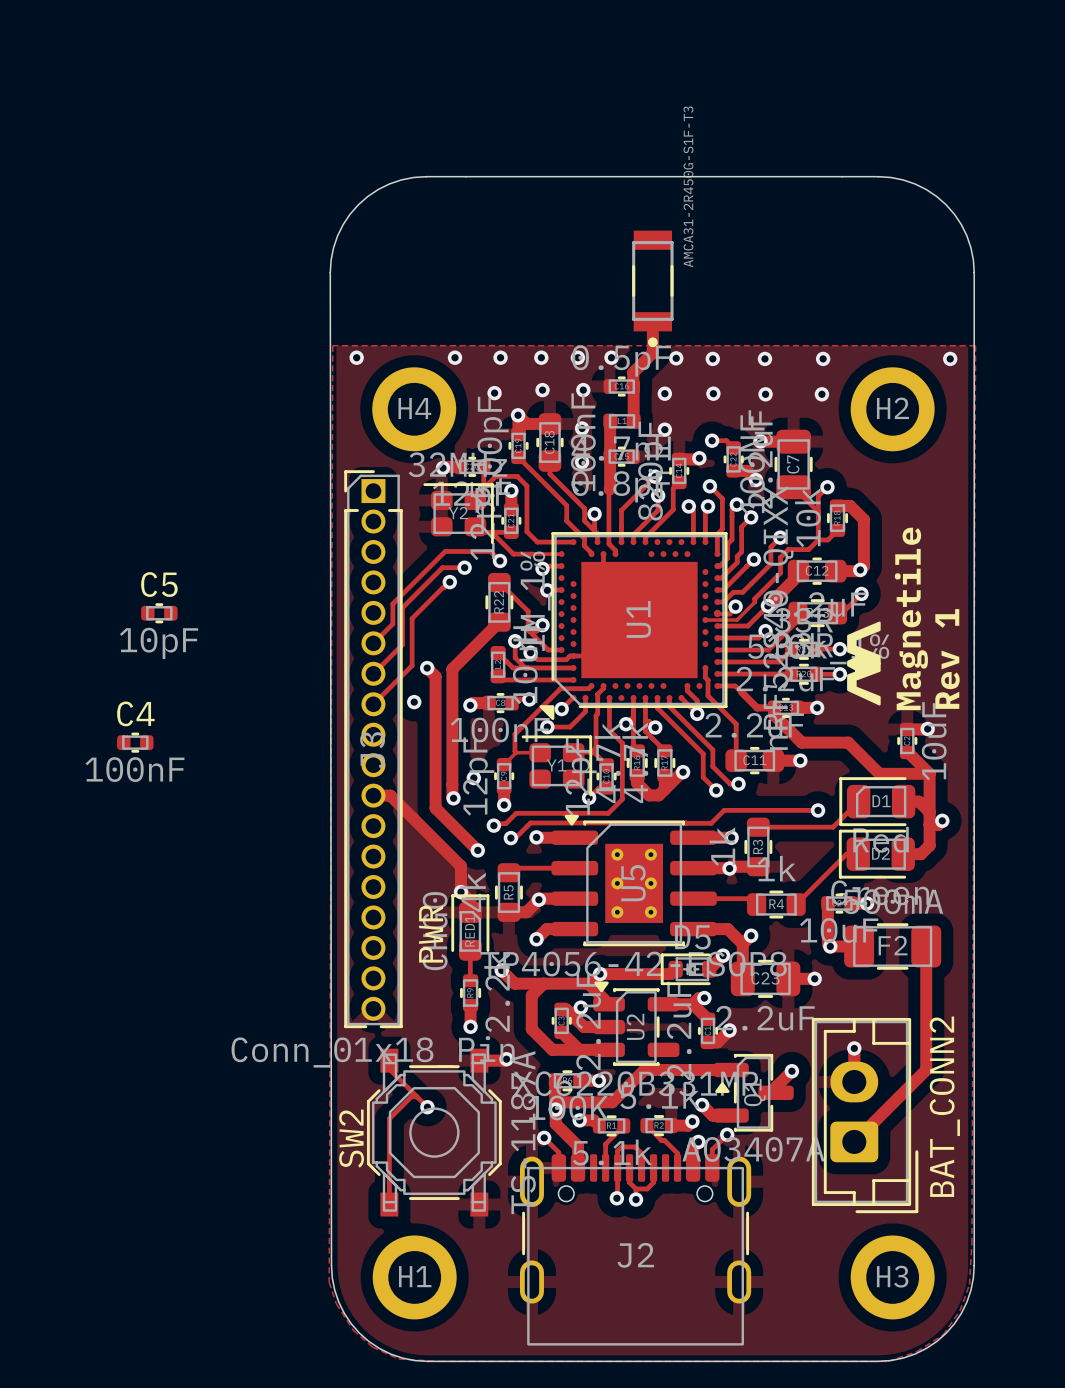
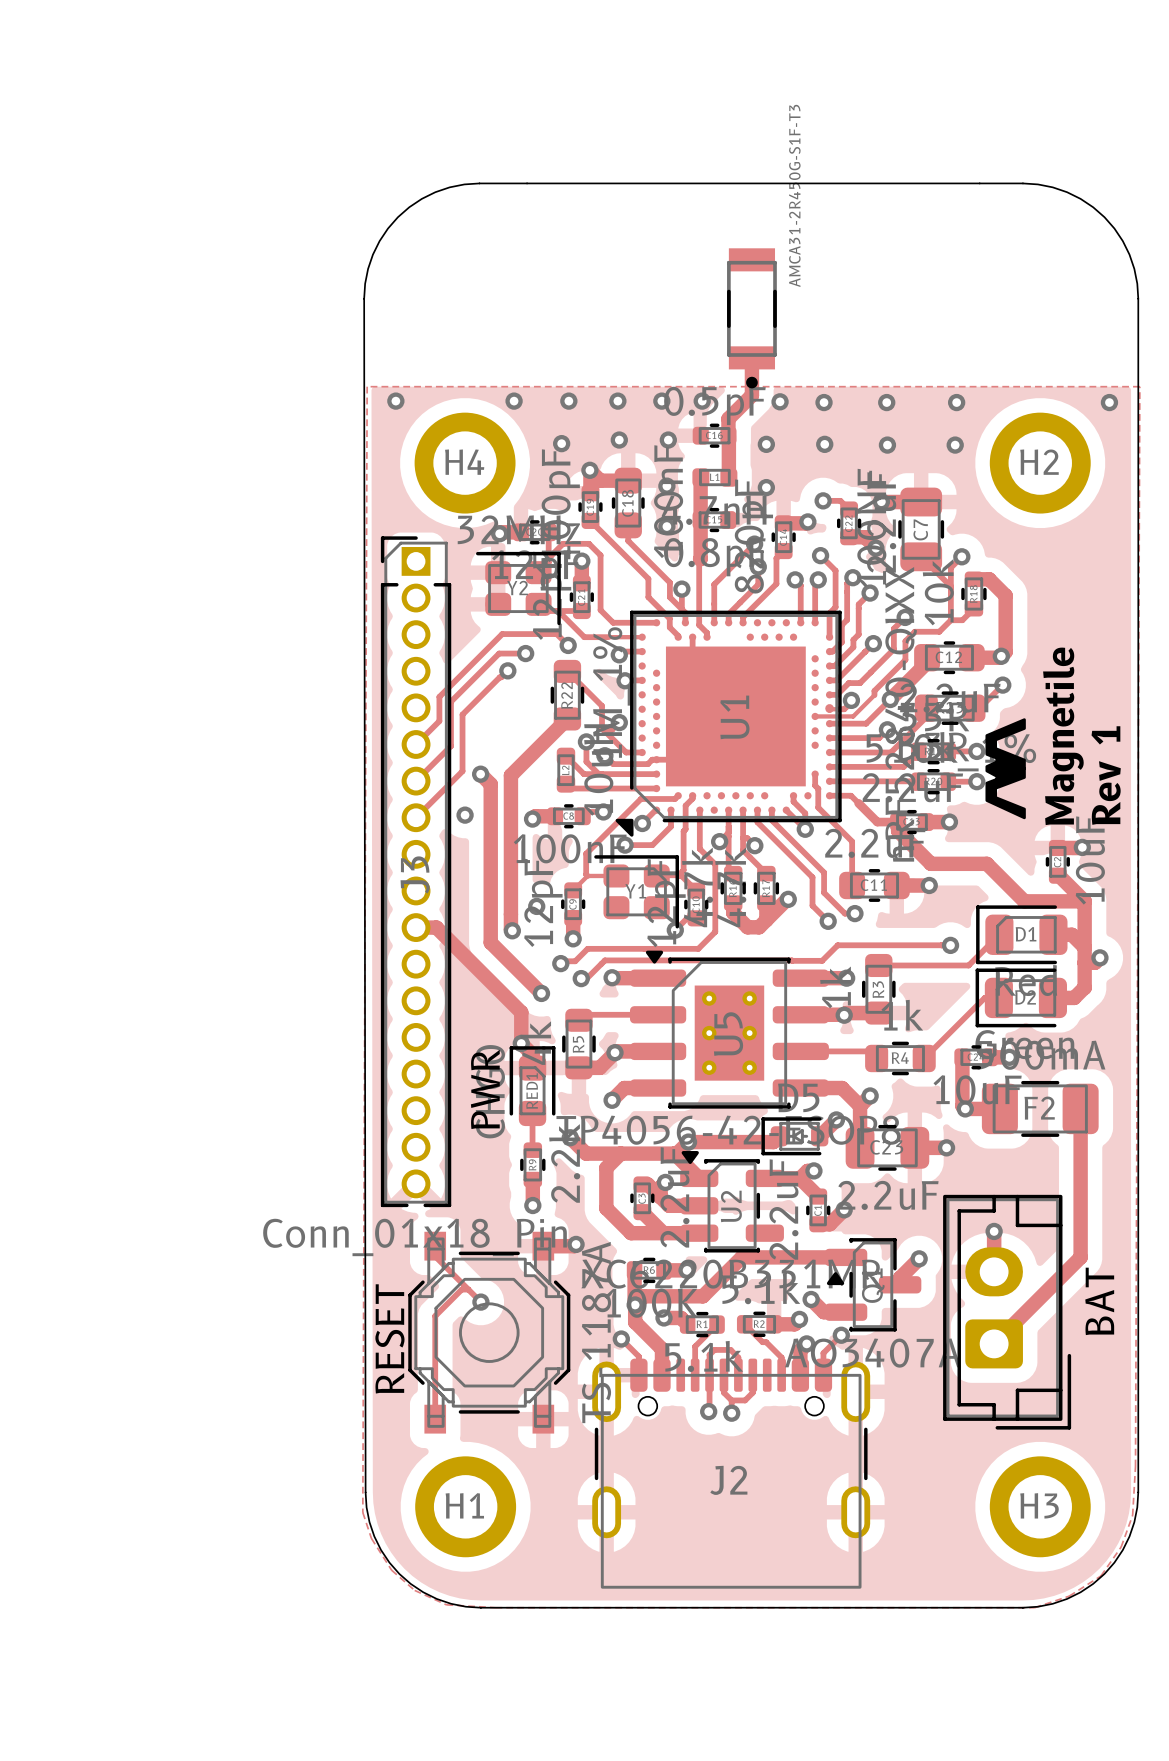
C5: 10pF (159, 613) -> none
C4: 100nF (135, 742) -> none
BAT_CONN2 name: BAT_CONN2 (944, 1106) -> BAT (1099, 1301)
SW2 name: SW2 (351, 1138) -> RESET (389, 1338)

